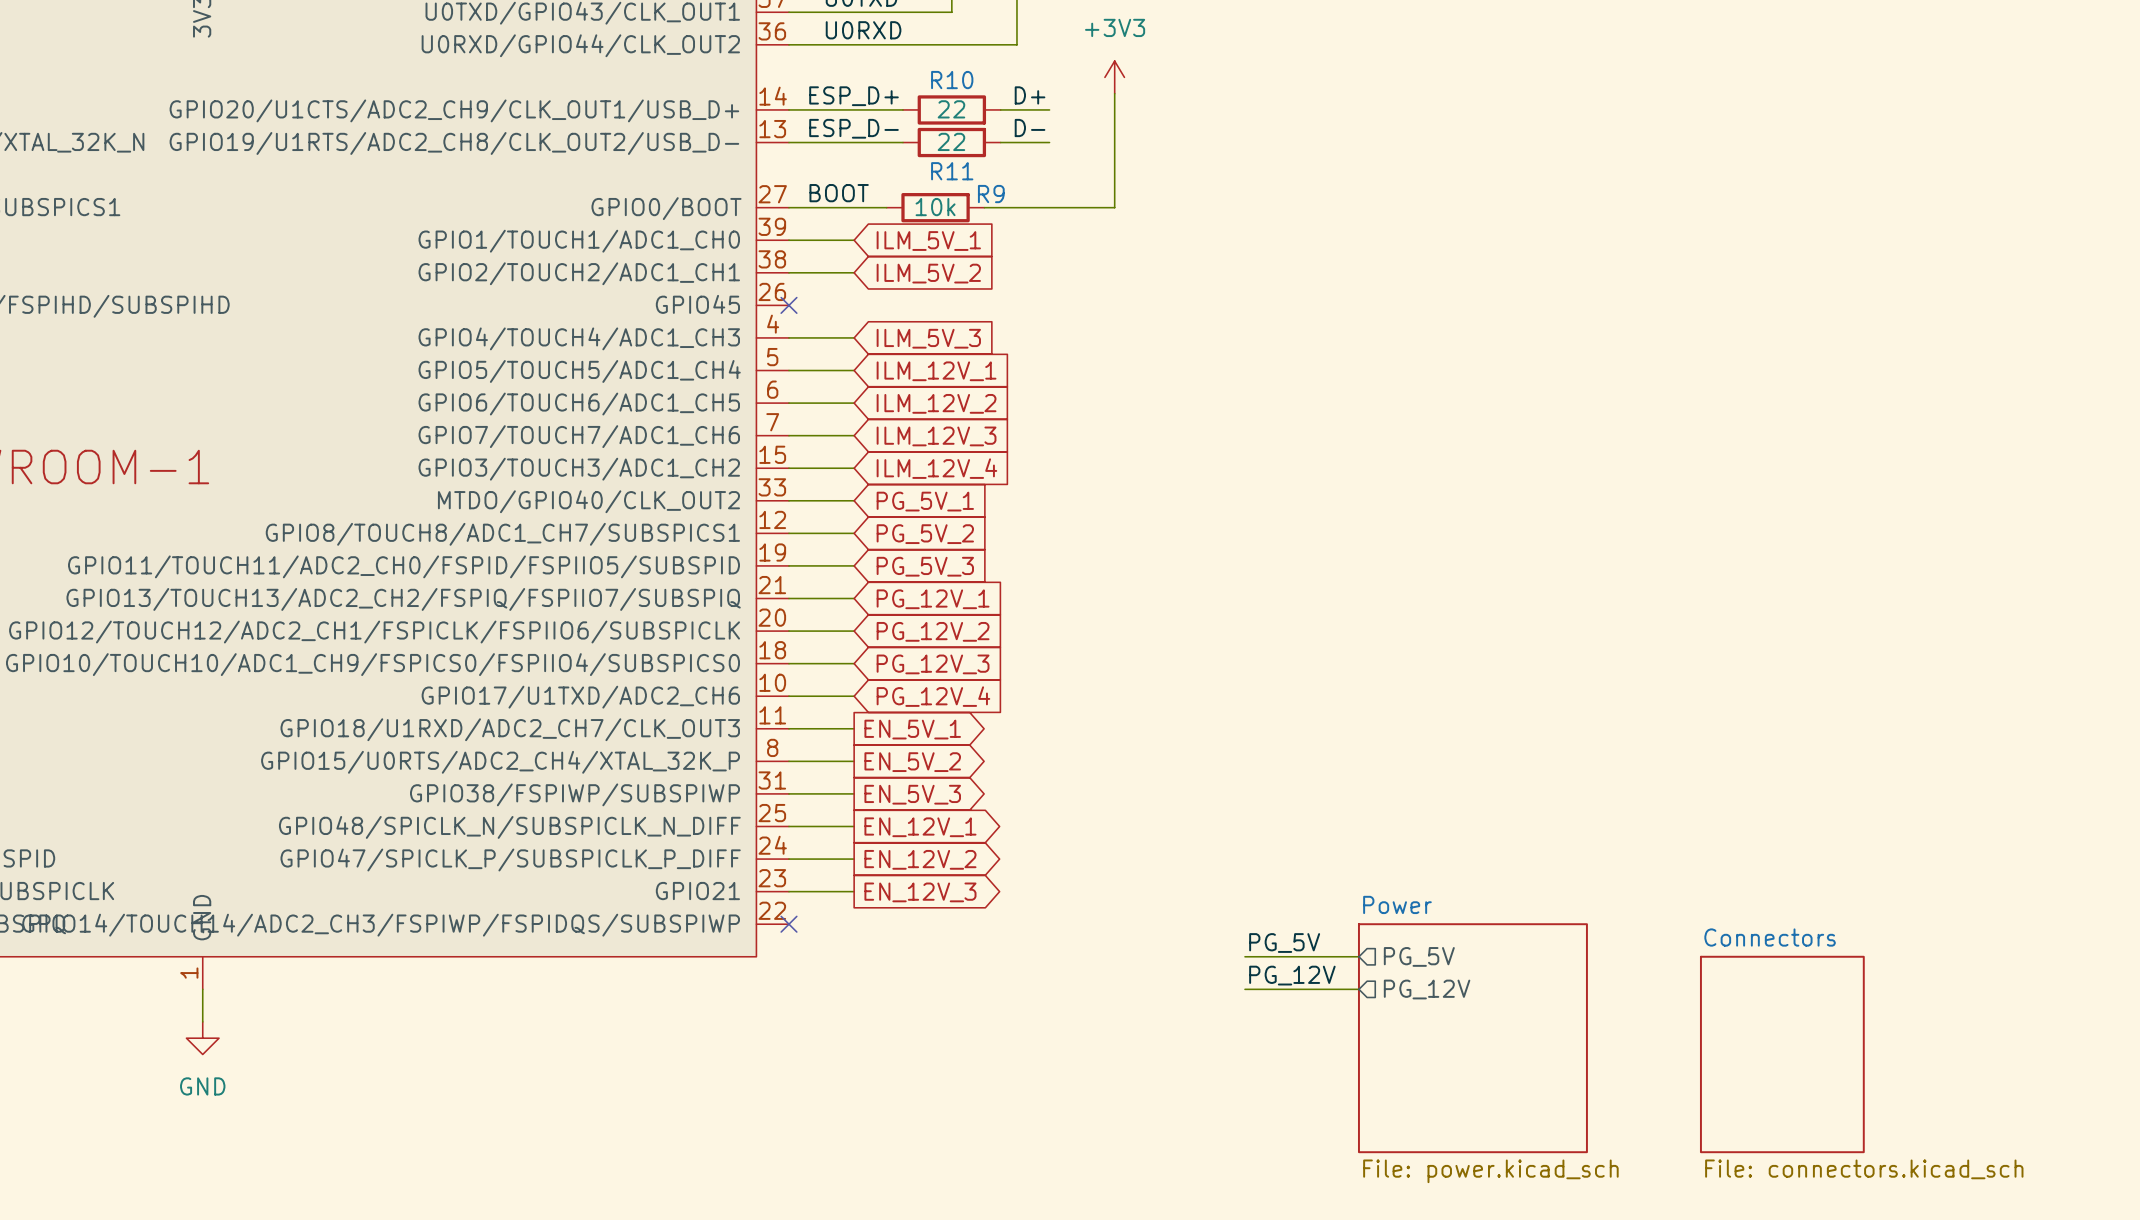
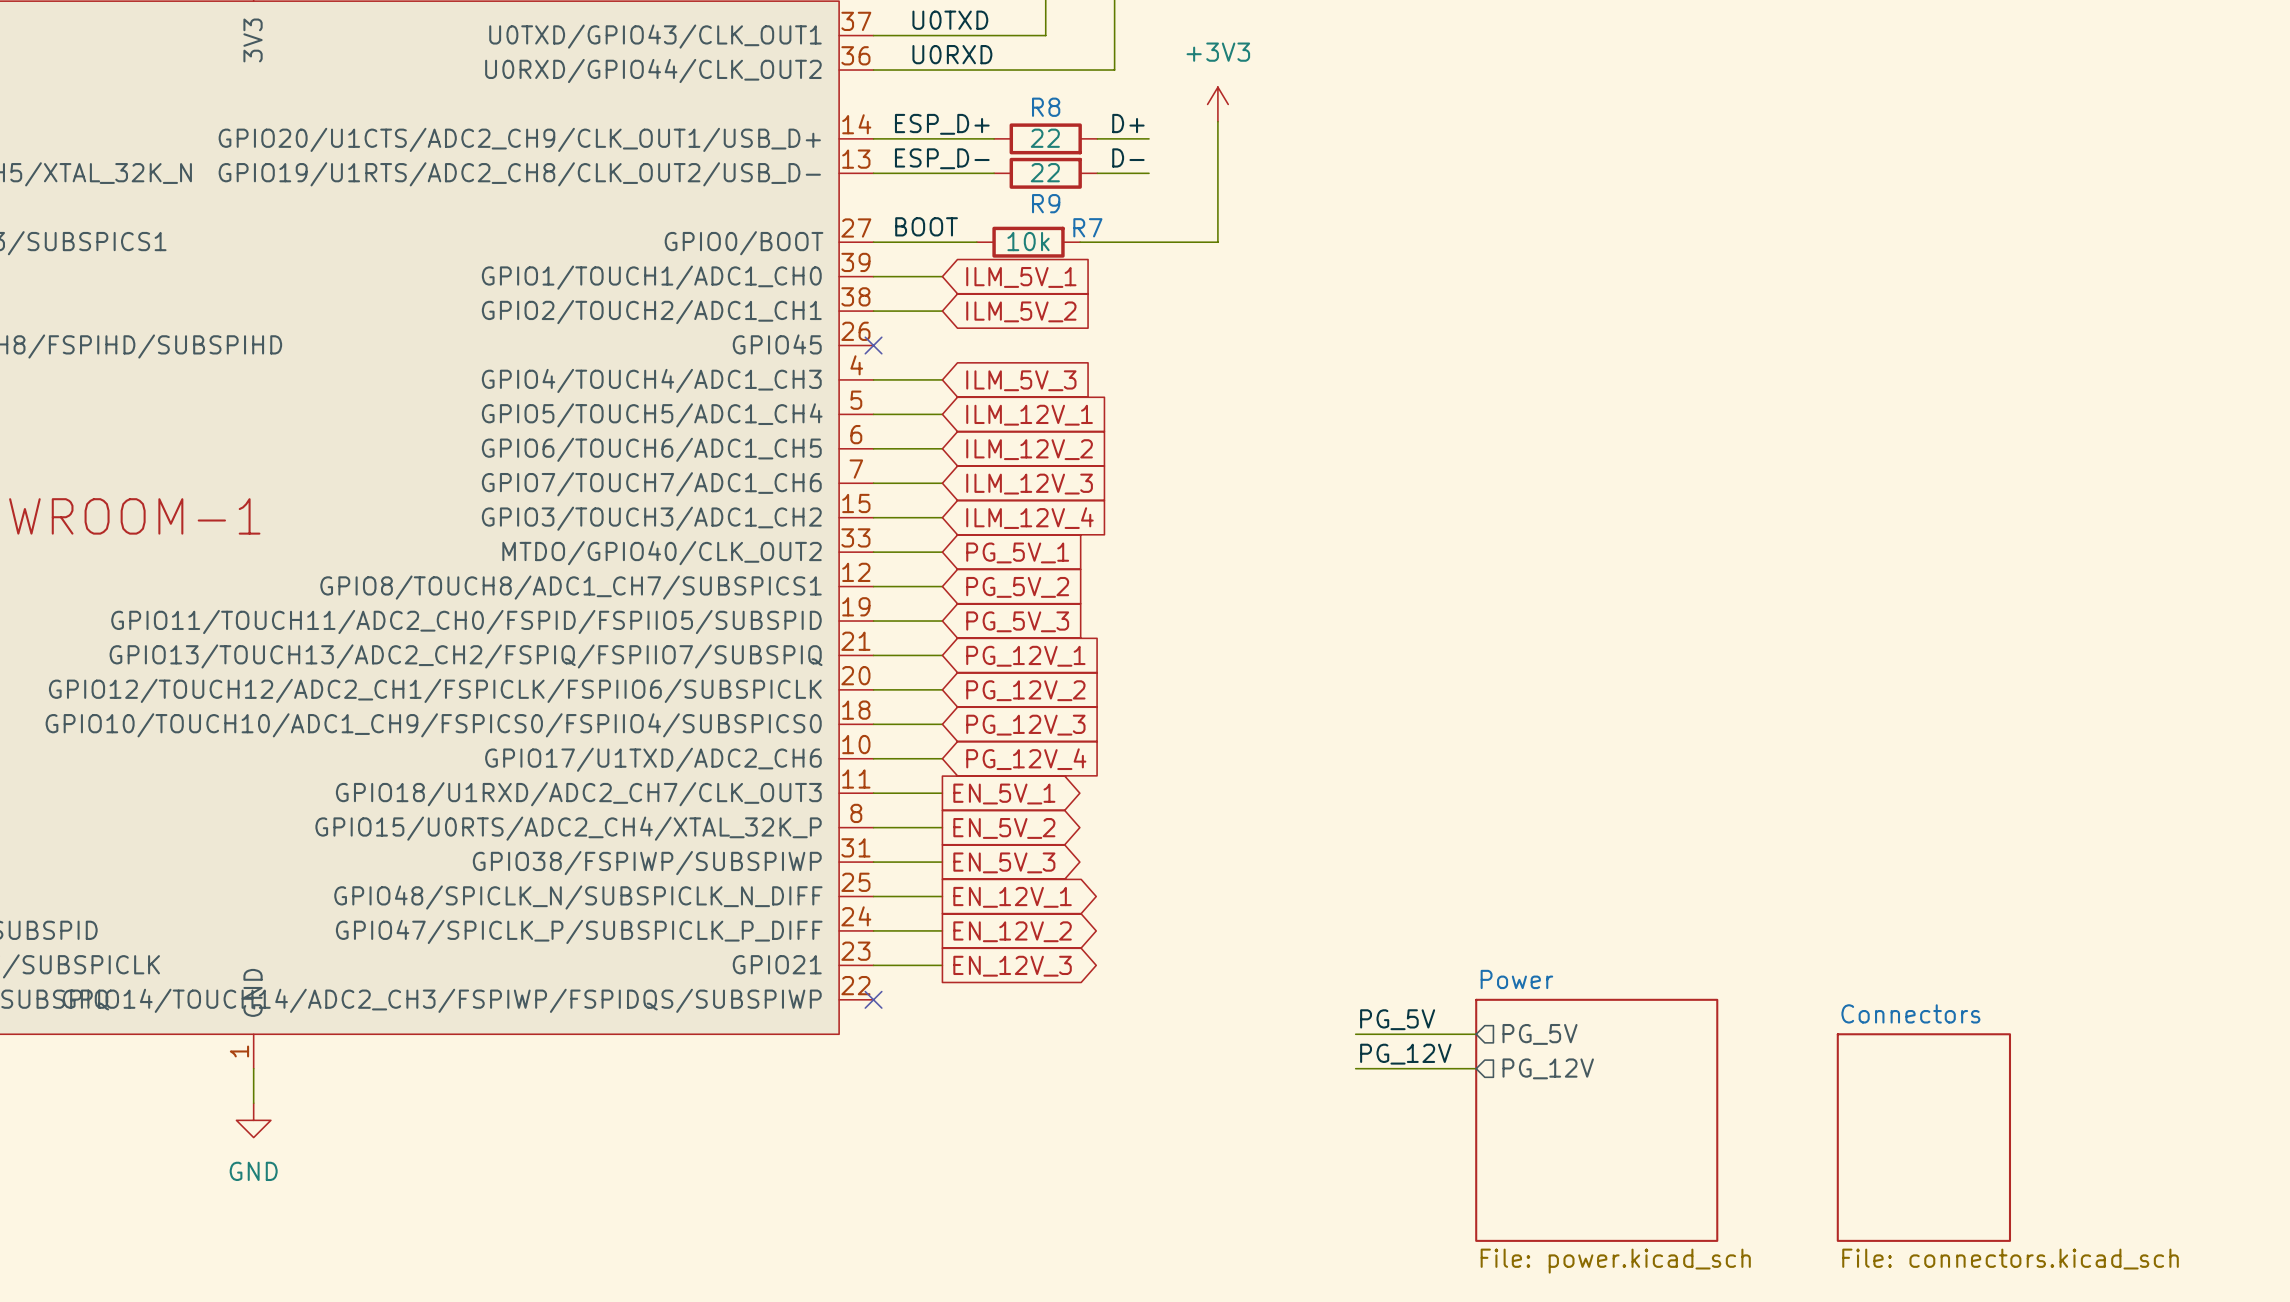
R10 name: R10 (952, 80) -> R8 (1046, 107)
R11 name: R11 (952, 171) -> R9 (1046, 203)
R9 name: R9 (991, 194) -> R7 (1087, 227)

